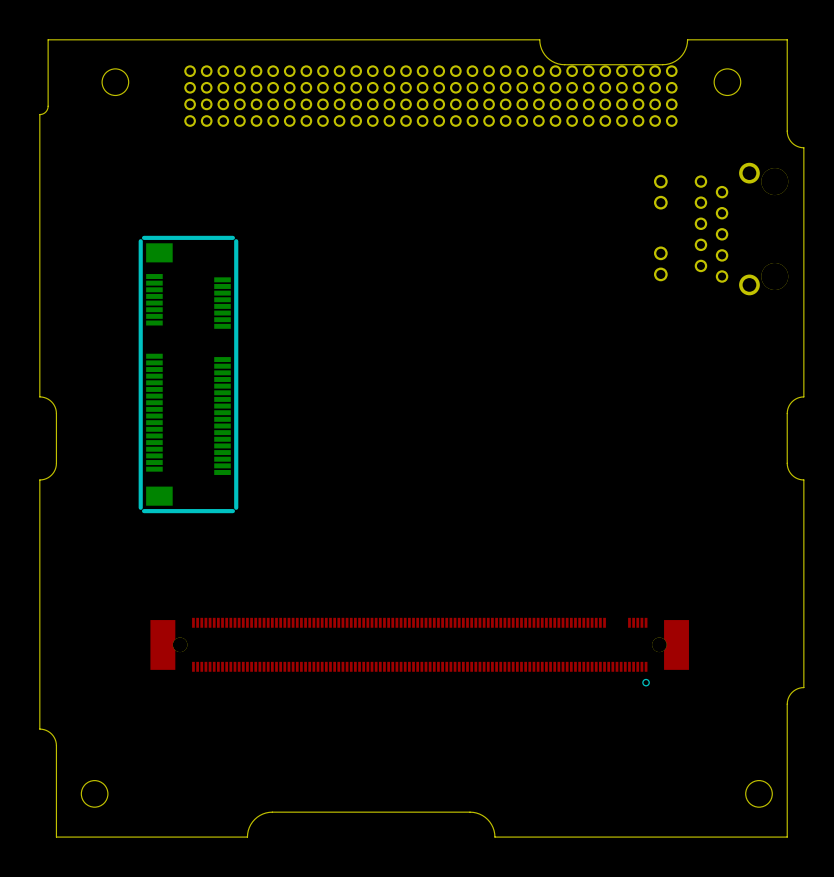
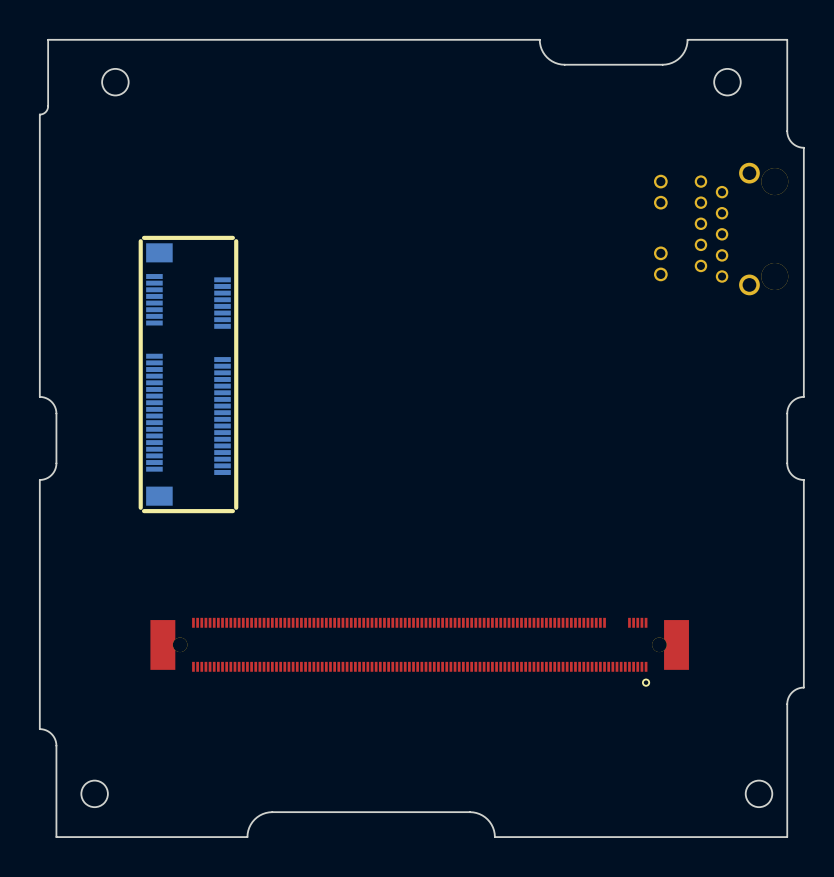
part: (430, 96) -> none

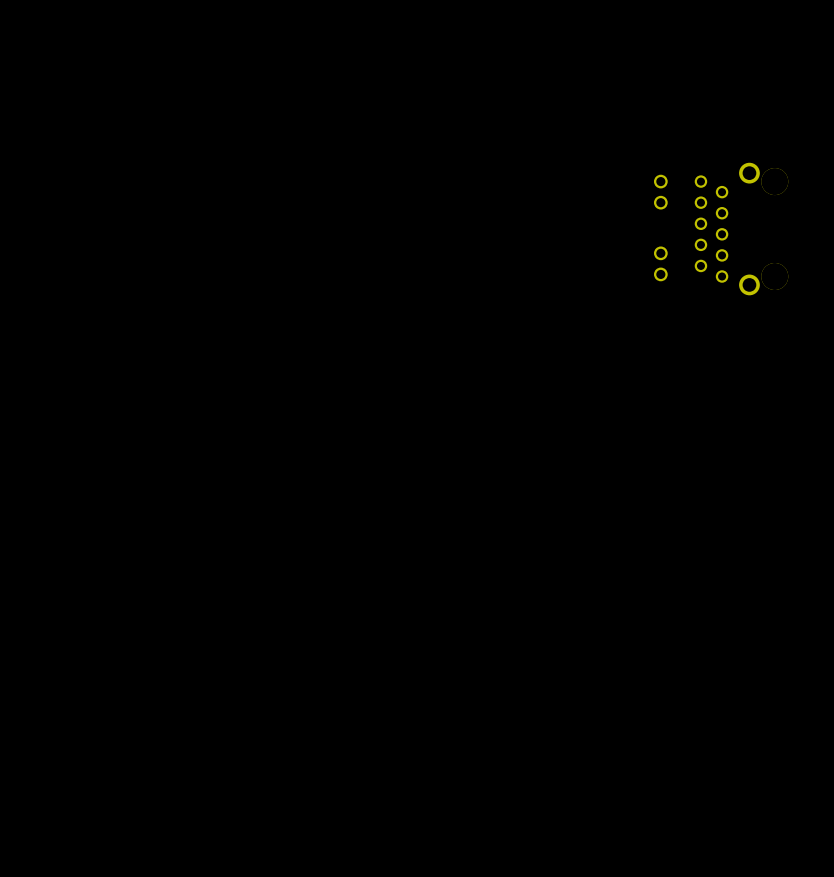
drawing: [39, 39, 805, 838] -> none
part: (188, 374) -> none
part: (419, 652) -> none

